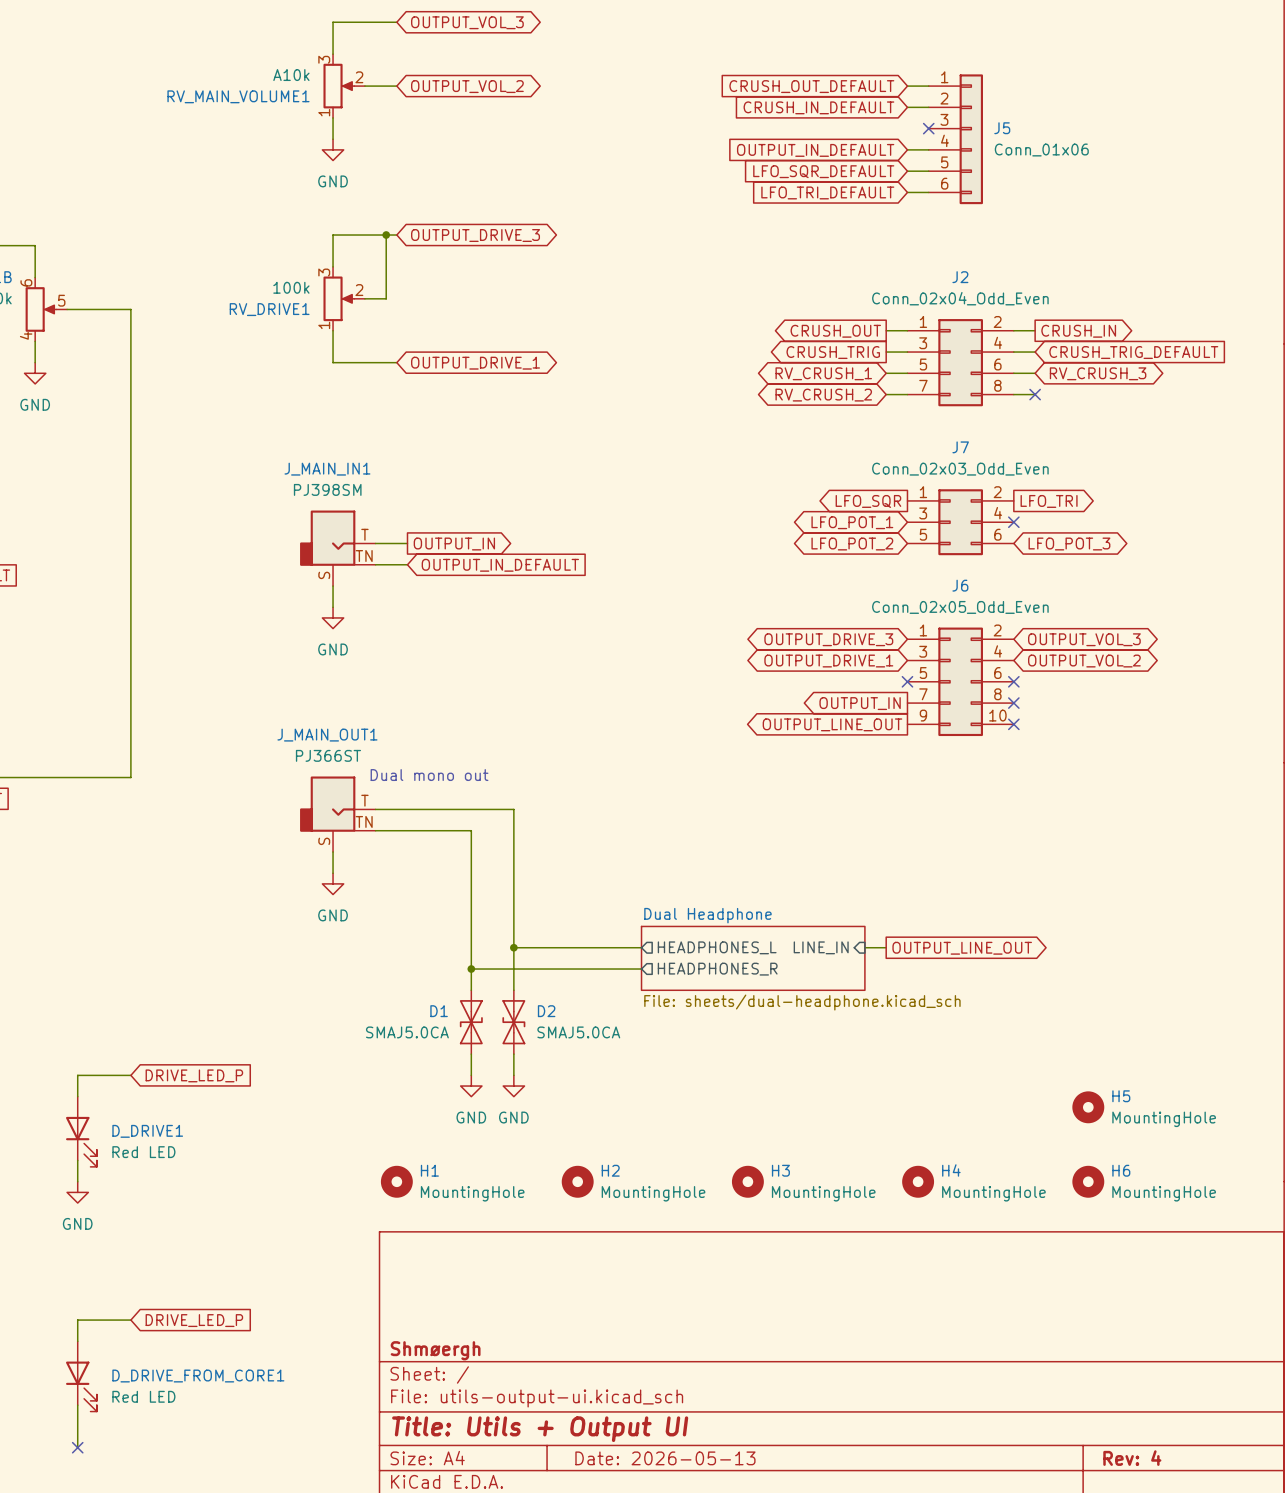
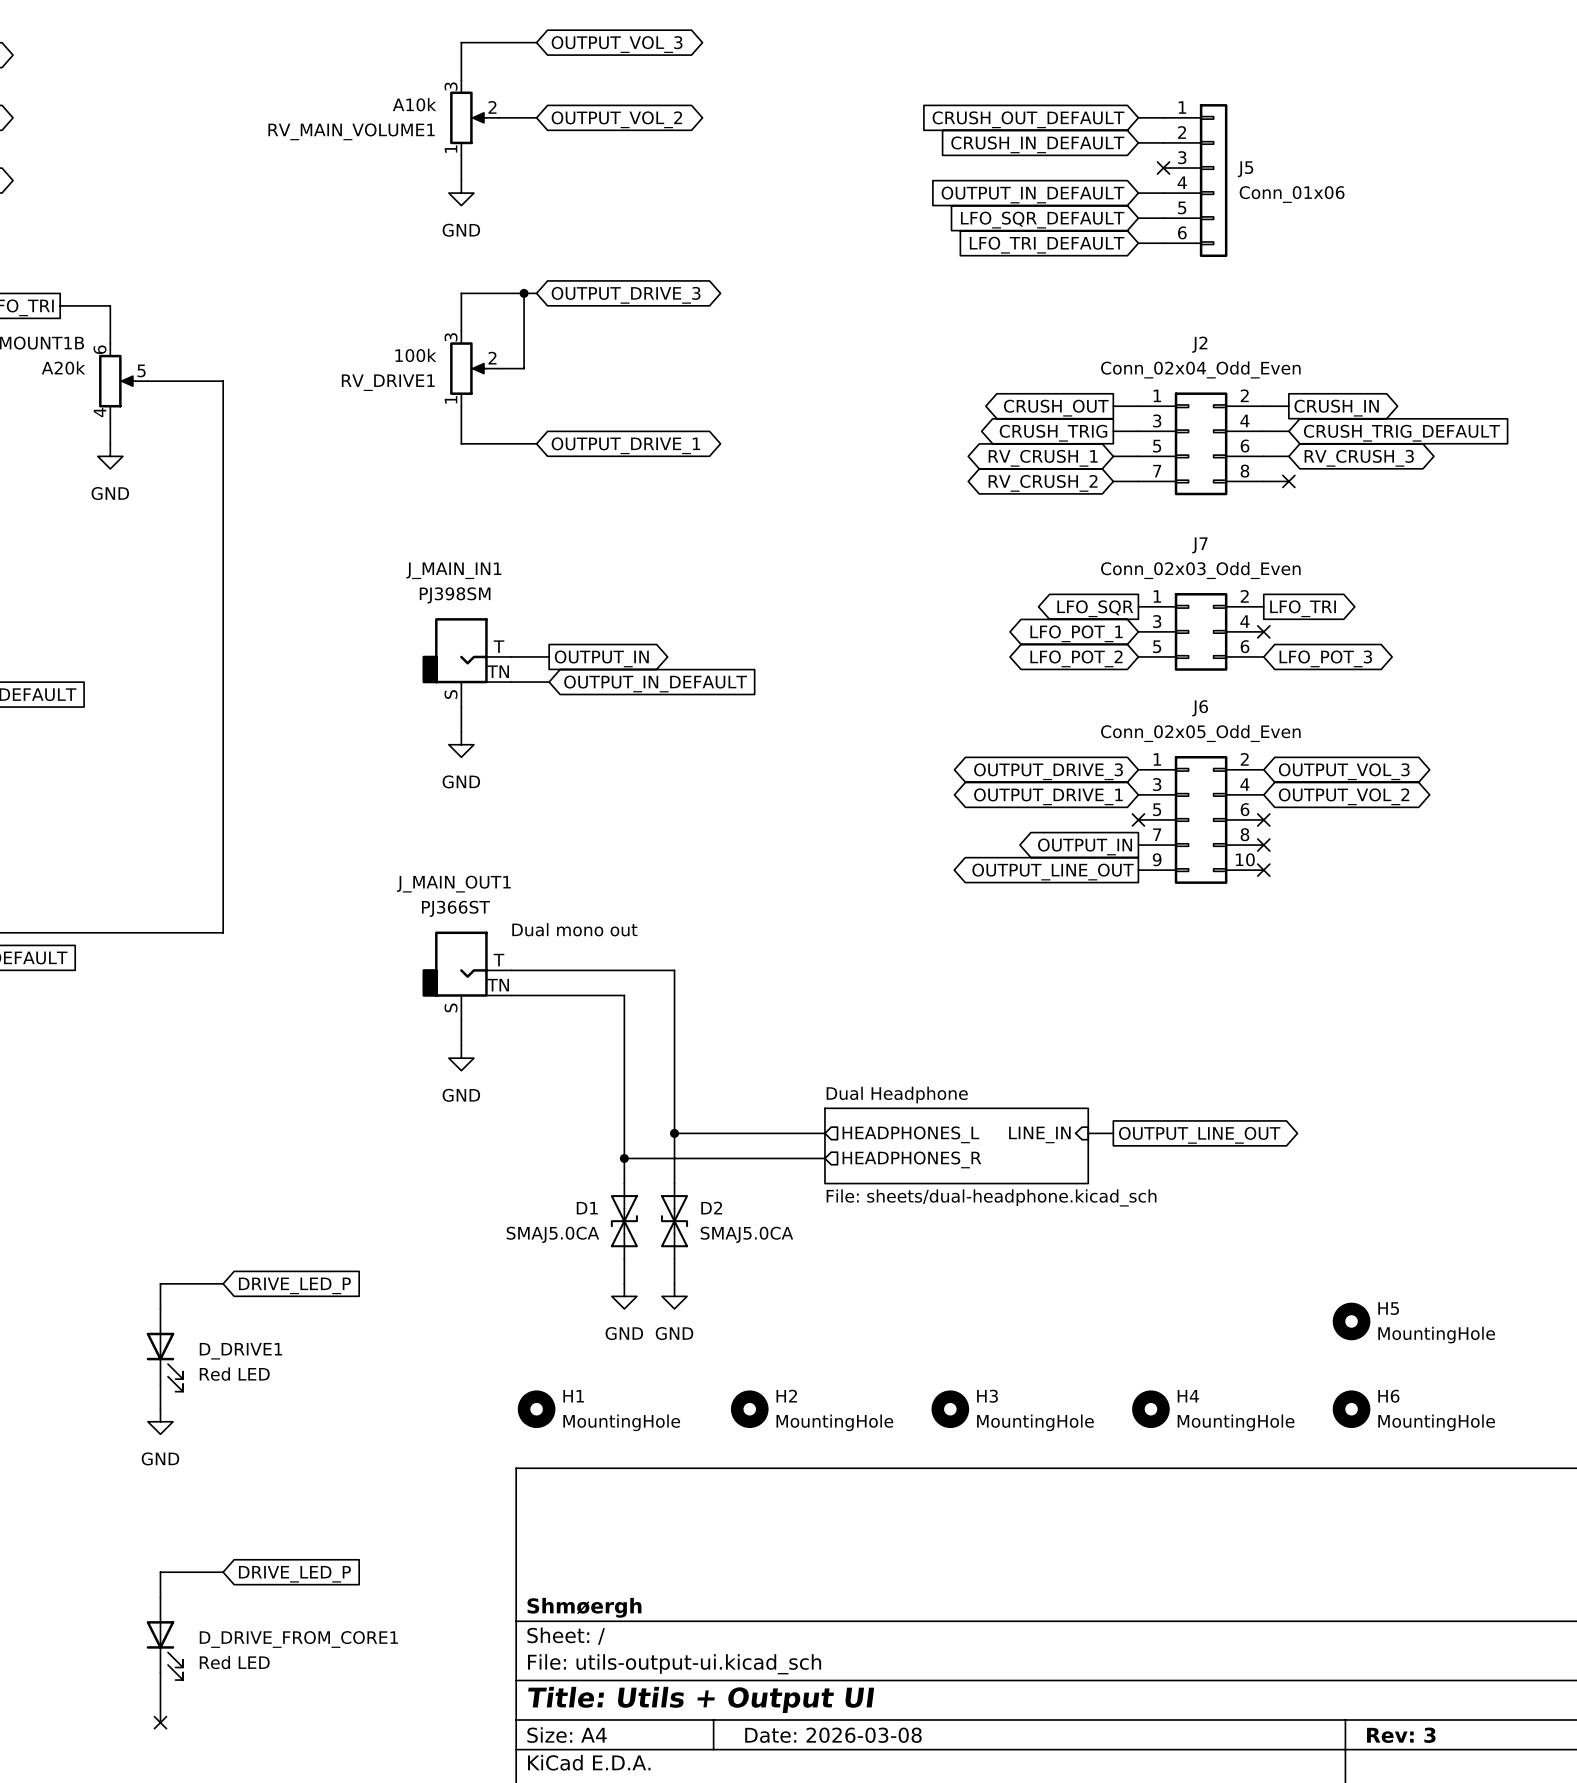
title block: Date: 2026-05-13 (665, 1458) -> Date: 2026-03-08 (833, 1735)
title block: Rev: 4 (1132, 1458) -> Rev: 3 (1401, 1735)

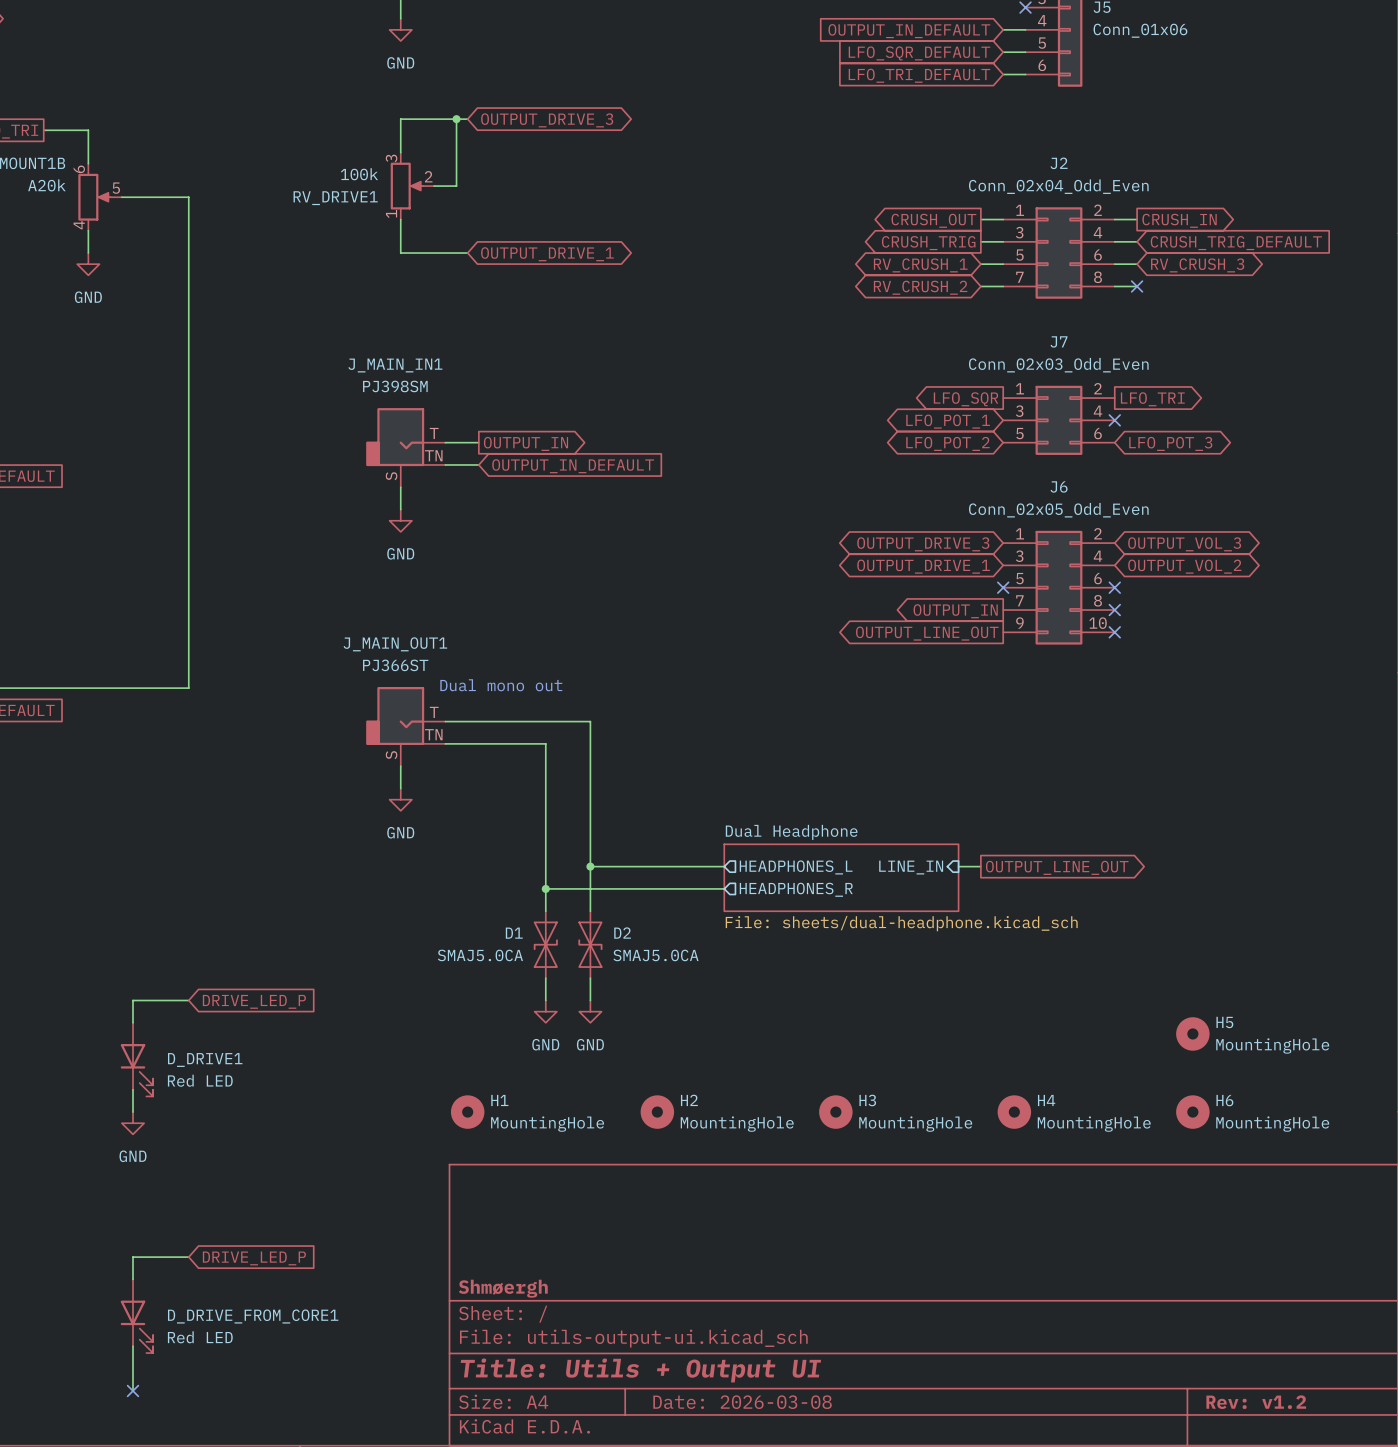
title block: Rev: 3 (1401, 1735) -> Rev: v1.2 (1256, 1402)

